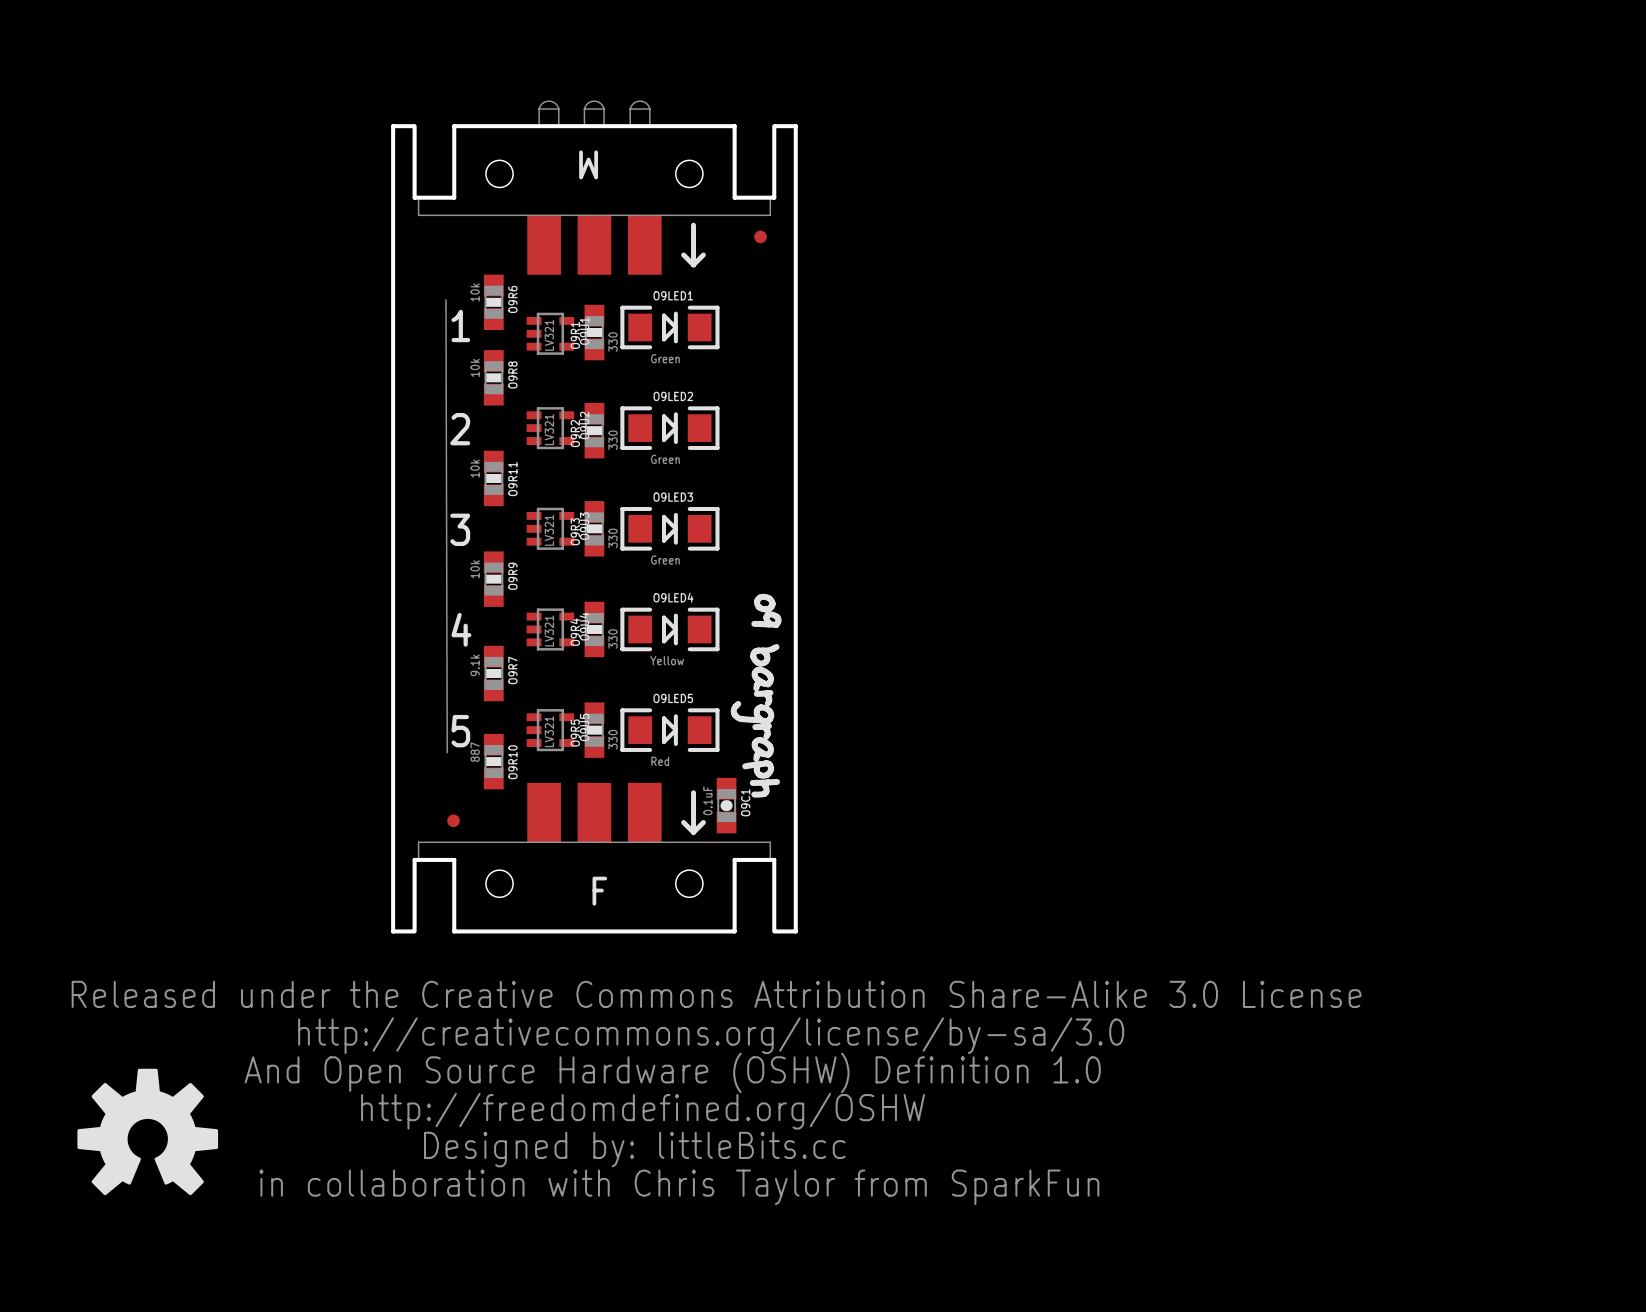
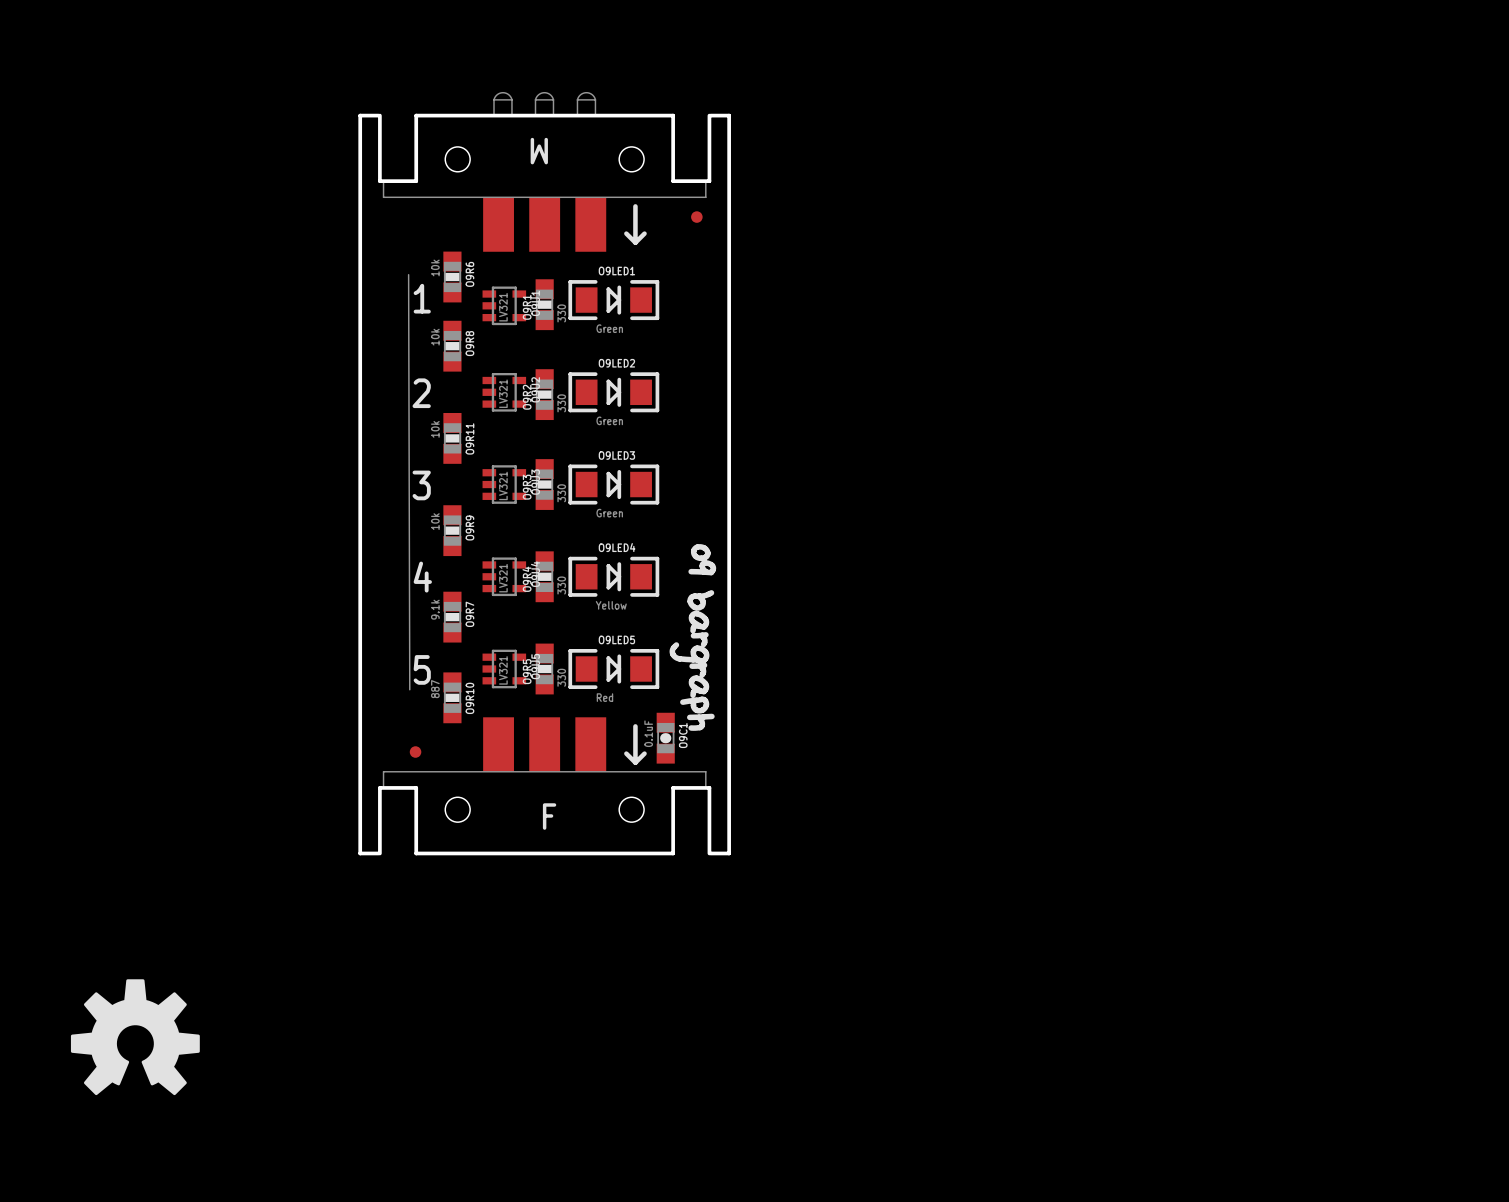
drawing: [71, 980, 1362, 1206] -> none

